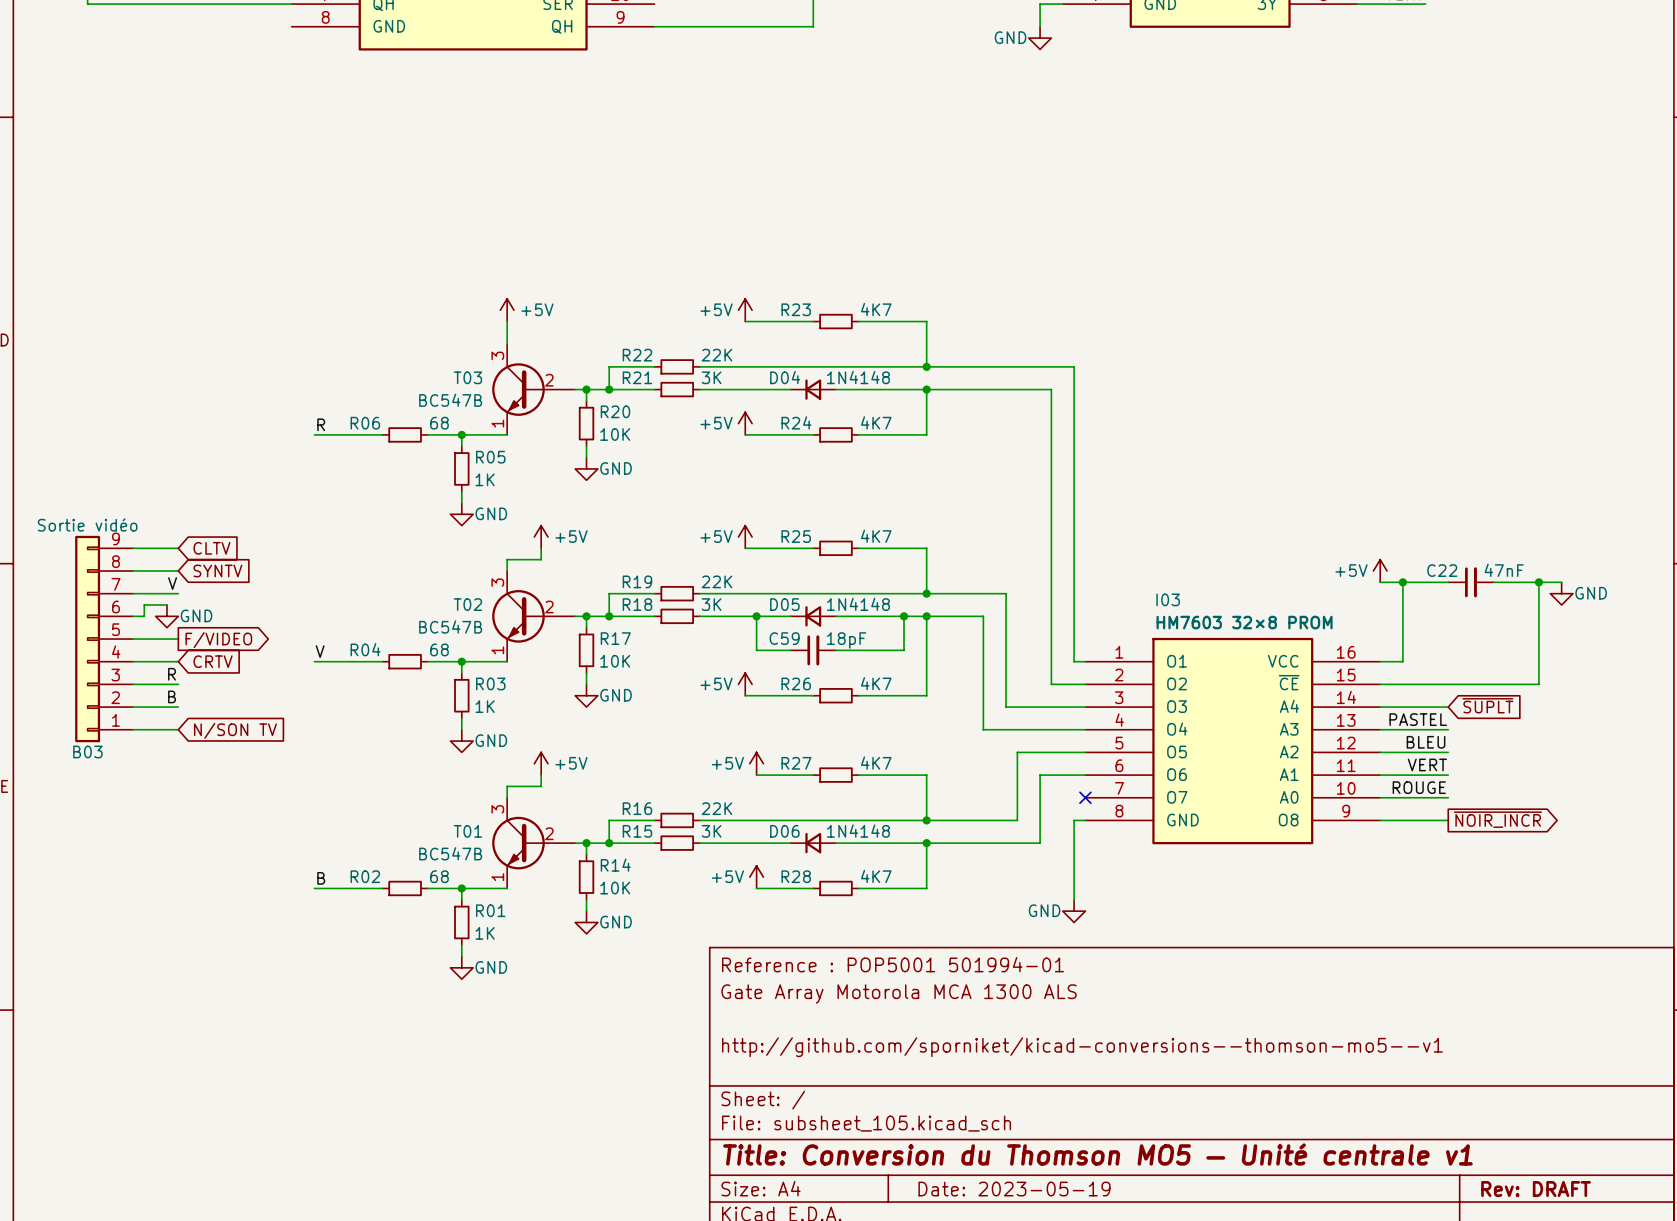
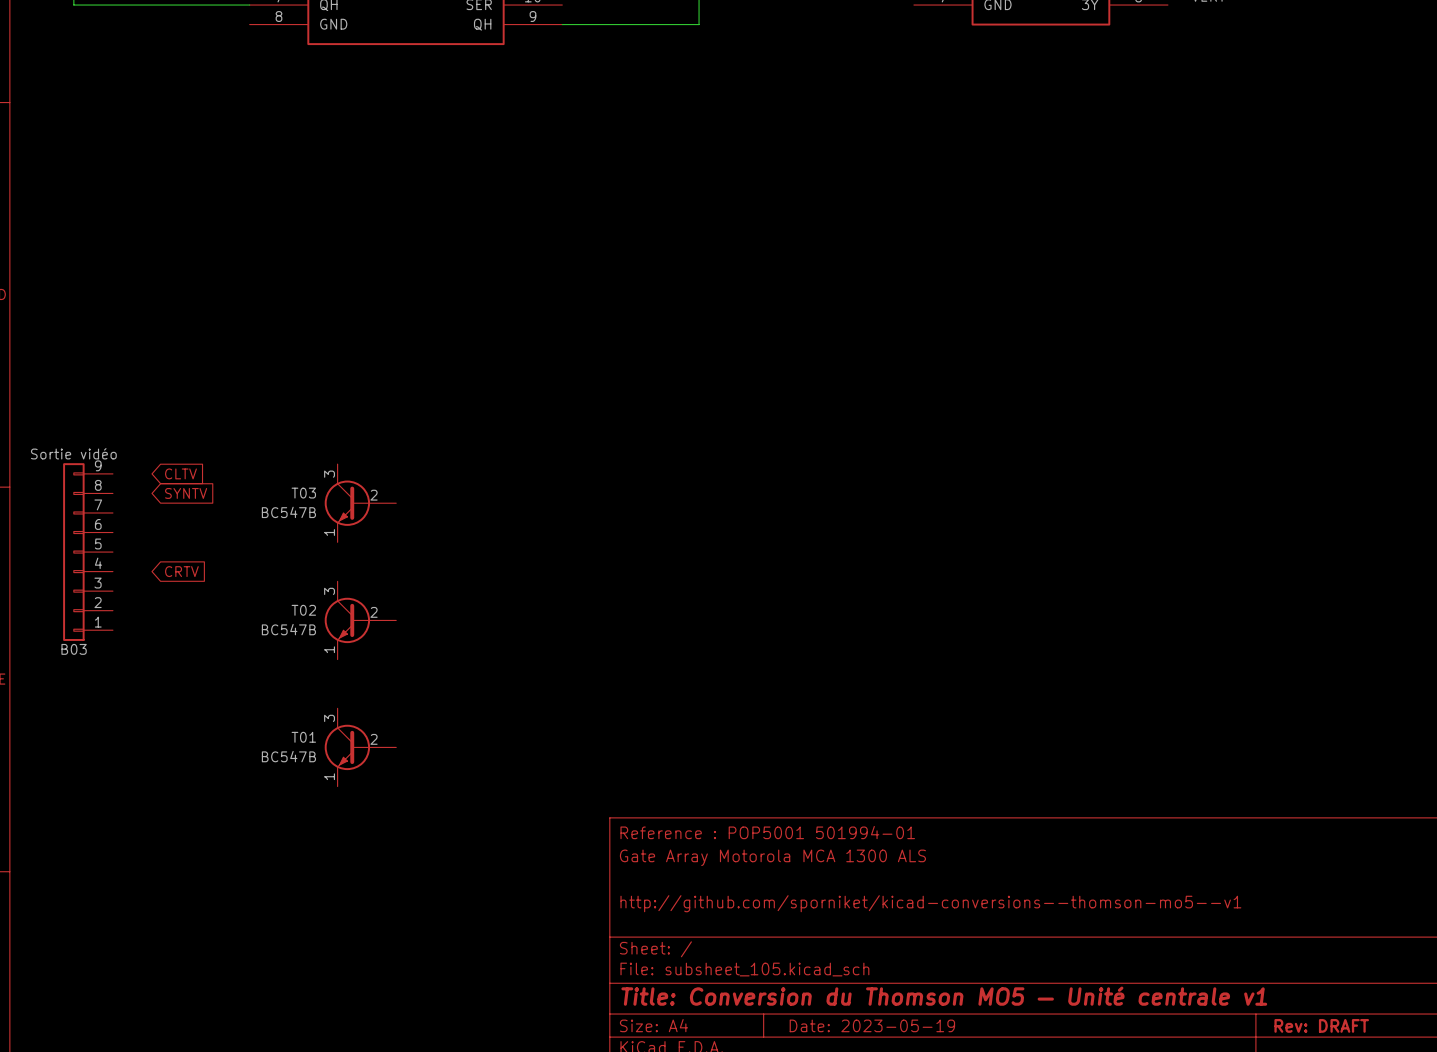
wire: (1062, 4) (1040, 4) (1040, 26) -> none
wire: (1357, 4) (1425, 4) -> none
power symbol: GND (1040, 38) -> none
power symbol: +5V (507, 310) -> none
power symbol: +5V (745, 310) -> none
wire: (507, 321) (507, 344) -> none
wire: (745, 321) (813, 321) -> none
R23: 4K7 (835, 321) -> none
wire: (858, 321) (926, 321) (926, 366) -> none
wire: (654, 366) (609, 366) (609, 389) -> none
R22: 22K (677, 366) -> none
wire: (699, 366) (1074, 366) (1074, 661) (1085, 661) -> none
junction: (926, 366) -> none
T03 position: (533, 389) -> (360, 503)
wire: (575, 389) (654, 389) -> none
wire: (586, 389) (586, 400) -> none
junction: (586, 389) -> none
junction: (609, 389) -> none
R21: 3K (677, 389) -> none
wire: (699, 389) (790, 389) -> none
D04: 1N4148 (813, 389) -> none
wire: (835, 389) (1051, 389) (1051, 684) (1085, 684) -> none
wire: (926, 389) (926, 434) (858, 434) -> none
junction: (926, 389) -> none
R20: 10K (586, 423) -> none
power symbol: +5V (745, 423) -> none
label: R (321, 424) -> none
wire: (314, 434) (382, 434) -> none
R06: 68 (405, 434) -> none
wire: (427, 434) (507, 434) -> none
wire: (461, 434) (461, 446) -> none
junction: (461, 434) -> none
wire: (745, 434) (813, 434) -> none
R24: 4K7 (835, 434) -> none
wire: (586, 446) (586, 457) -> none
R05: 1K (461, 468) -> none
power symbol: GND (586, 468) -> none
wire: (461, 491) (461, 502) -> none
power symbol: GND (461, 514) -> none
power symbol: +5V (541, 536) -> none
power symbol: +5V (745, 536) -> none
wire: (132, 548) (178, 548) -> none
wire: (541, 548) (541, 559) (507, 559) (507, 570) -> none
wire: (745, 548) (813, 548) -> none
R25: 4K7 (835, 548) -> none
wire: (858, 548) (926, 548) (926, 593) -> none
wire: (132, 570) (178, 570) -> none
power symbol: +5V (1380, 570) -> none
wire: (1380, 582) (1448, 582) -> none
wire: (1402, 582) (1402, 661) (1380, 661) -> none
junction: (1402, 582) -> none
C22: 47nF (1470, 582) -> none
wire: (1493, 582) (1561, 582) -> none
wire: (1538, 582) (1538, 684) (1380, 684) -> none
junction: (1538, 582) -> none
label: V (172, 583) -> none
wire: (132, 593) (178, 593) -> none
wire: (654, 593) (609, 593) (609, 616) -> none
R19: 22K (677, 593) -> none
wire: (699, 593) (1006, 593) (1006, 707) (1085, 707) -> none
junction: (926, 593) -> none
power symbol: GND (1561, 593) -> none
wire: (166, 605) (144, 605) (144, 616) (132, 616) -> none
power symbol: GND (166, 616) -> none
T02 position: (533, 616) -> (360, 620)
wire: (575, 616) (654, 616) -> none
wire: (586, 616) (586, 627) -> none
junction: (586, 616) -> none
junction: (609, 616) -> none
R18: 3K (677, 616) -> none
wire: (699, 616) (790, 616) -> none
wire: (756, 616) (756, 650) (790, 650) -> none
junction: (756, 616) -> none
D05: 1N4148 (813, 616) -> none
wire: (835, 616) (983, 616) (983, 729) (1085, 729) -> none
wire: (904, 616) (904, 650) (835, 650) -> none
junction: (904, 616) -> none
wire: (926, 616) (926, 695) (858, 695) -> none
junction: (926, 616) -> none
wire: (132, 639) (178, 639) -> none
global label: F/VIDEO (218, 640) -> none
R17: 10K (586, 650) -> none
C59: 18pF (813, 650) -> none
label: V (320, 651) -> none
wire: (132, 661) (178, 661) -> none
wire: (314, 661) (382, 661) -> none
R04: 68 (405, 661) -> none
wire: (427, 661) (507, 661) -> none
wire: (461, 661) (461, 673) -> none
junction: (461, 661) -> none
wire: (586, 673) (586, 684) -> none
label: R (172, 674) -> none
wire: (132, 684) (178, 684) -> none
power symbol: +5V (745, 684) -> none
R03: 1K (461, 695) -> none
power symbol: GND (586, 695) -> none
wire: (745, 695) (813, 695) -> none
R26: 4K7 (835, 695) -> none
label: B (172, 696) -> none
global label: ~{SUPLT} (1487, 705) -> none
wire: (132, 707) (178, 707) -> none
wire: (1380, 707) (1448, 707) -> none
wire: (461, 718) (461, 729) -> none
label: PASTEL (1418, 719) -> none
wire: (132, 729) (178, 729) -> none
wire: (1380, 729) (1448, 729) -> none
global label: N/SON TV (235, 730) -> none
power symbol: GND (461, 741) -> none
I03: HM7603 32×8 PROM (1232, 741) -> none
label: BLEU (1426, 742) -> none
wire: (1085, 752) (1017, 752) (1017, 820) (699, 820) -> none
wire: (1380, 752) (1448, 752) -> none
power symbol: +5V (541, 763) -> none
power symbol: +5V (756, 763) -> none
label: VERT (1427, 764) -> none
wire: (541, 775) (541, 786) (507, 786) (507, 797) -> none
wire: (756, 775) (813, 775) -> none
R27: 4K7 (835, 775) -> none
wire: (858, 775) (926, 775) (926, 820) -> none
wire: (1085, 775) (1040, 775) (1040, 843) (835, 843) -> none
wire: (1380, 775) (1448, 775) -> none
label: ROUGE (1419, 787) -> none
no-connect mark: (1085, 797) -> none
wire: (1380, 797) (1448, 797) -> none
global label: ~{NOIR_INCR} (1497, 819) -> none
wire: (654, 820) (609, 820) (609, 843) -> none
R16: 22K (677, 820) -> none
junction: (926, 820) -> none
wire: (1085, 820) (1074, 820) (1074, 899) -> none
wire: (1380, 820) (1448, 820) -> none
T01 position: (533, 843) -> (360, 747)
wire: (575, 843) (654, 843) -> none
wire: (586, 843) (586, 854) -> none
junction: (586, 843) -> none
junction: (609, 843) -> none
R15: 3K (677, 843) -> none
wire: (699, 843) (790, 843) -> none
D06: 1N4148 (813, 843) -> none
wire: (926, 843) (926, 888) (858, 888) -> none
junction: (926, 843) -> none
R14: 10K (586, 877) -> none
power symbol: +5V (756, 877) -> none
label: B (321, 878) -> none
wire: (314, 888) (382, 888) -> none
R02: 68 (405, 888) -> none
wire: (427, 888) (507, 888) -> none
wire: (461, 888) (461, 899) -> none
junction: (461, 888) -> none
wire: (756, 888) (813, 888) -> none
R28: 4K7 (835, 888) -> none
wire: (586, 899) (586, 911) -> none
power symbol: GND (1074, 911) -> none
R01: 1K (461, 922) -> none
power symbol: GND (586, 922) -> none
wire: (461, 945) (461, 956) -> none
power symbol: GND (461, 967) -> none

